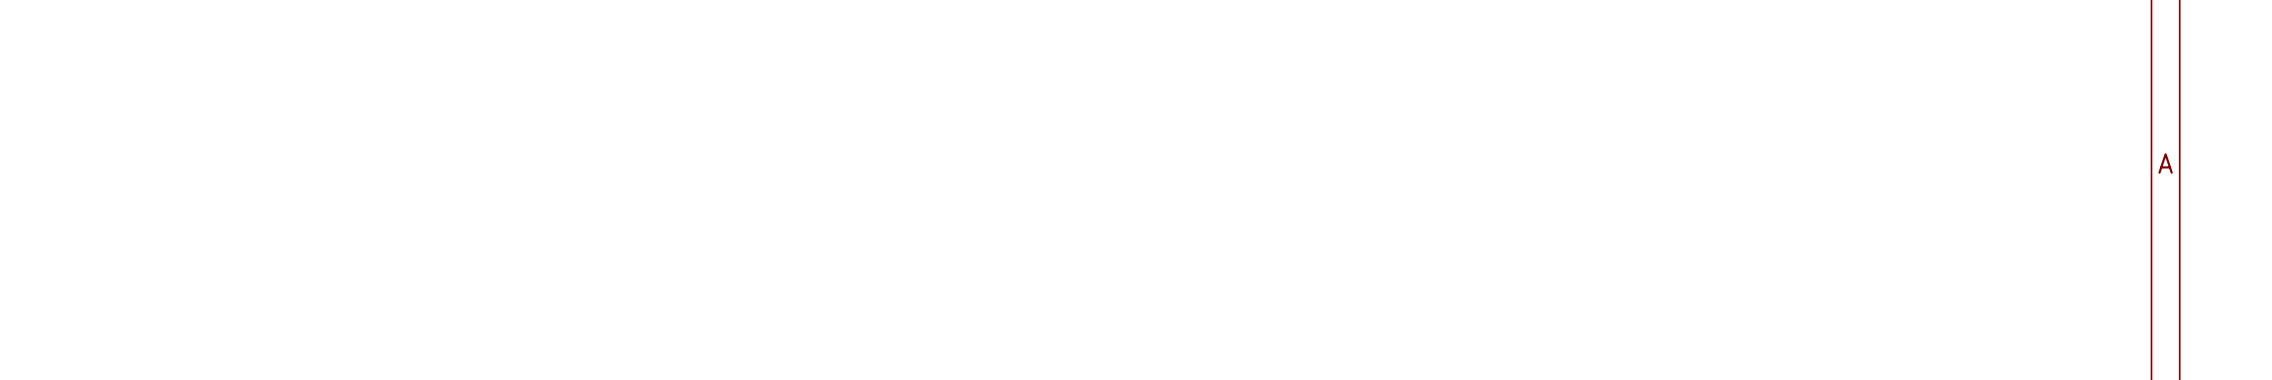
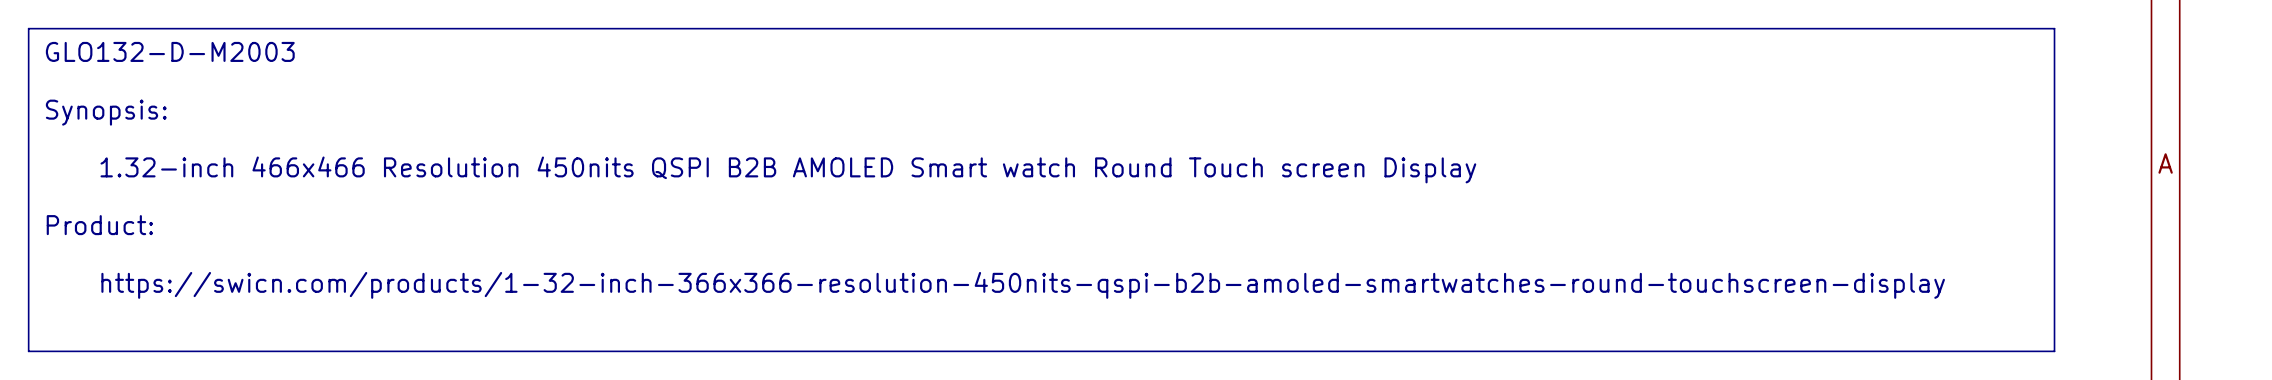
line: none -> (28, 28) (2054, 28) (2054, 351) (28, 351) (28, 28)
text: none -> GLO132-D-M2003 (170, 51)
text: none -> Synopsis: (106, 112)
text: none -> 1.32-inch 466x466 Resolution 450nits QSPI B2B AMOLED Smart watch Round Touch screen Display (788, 169)
text: none -> Product: (99, 225)
text: none -> https://swicn.com/products/1-32-inch-366x366-resolution-450nits-qspi-b2b-amoled-smartwatches-round-touchscreen-display (1023, 285)

